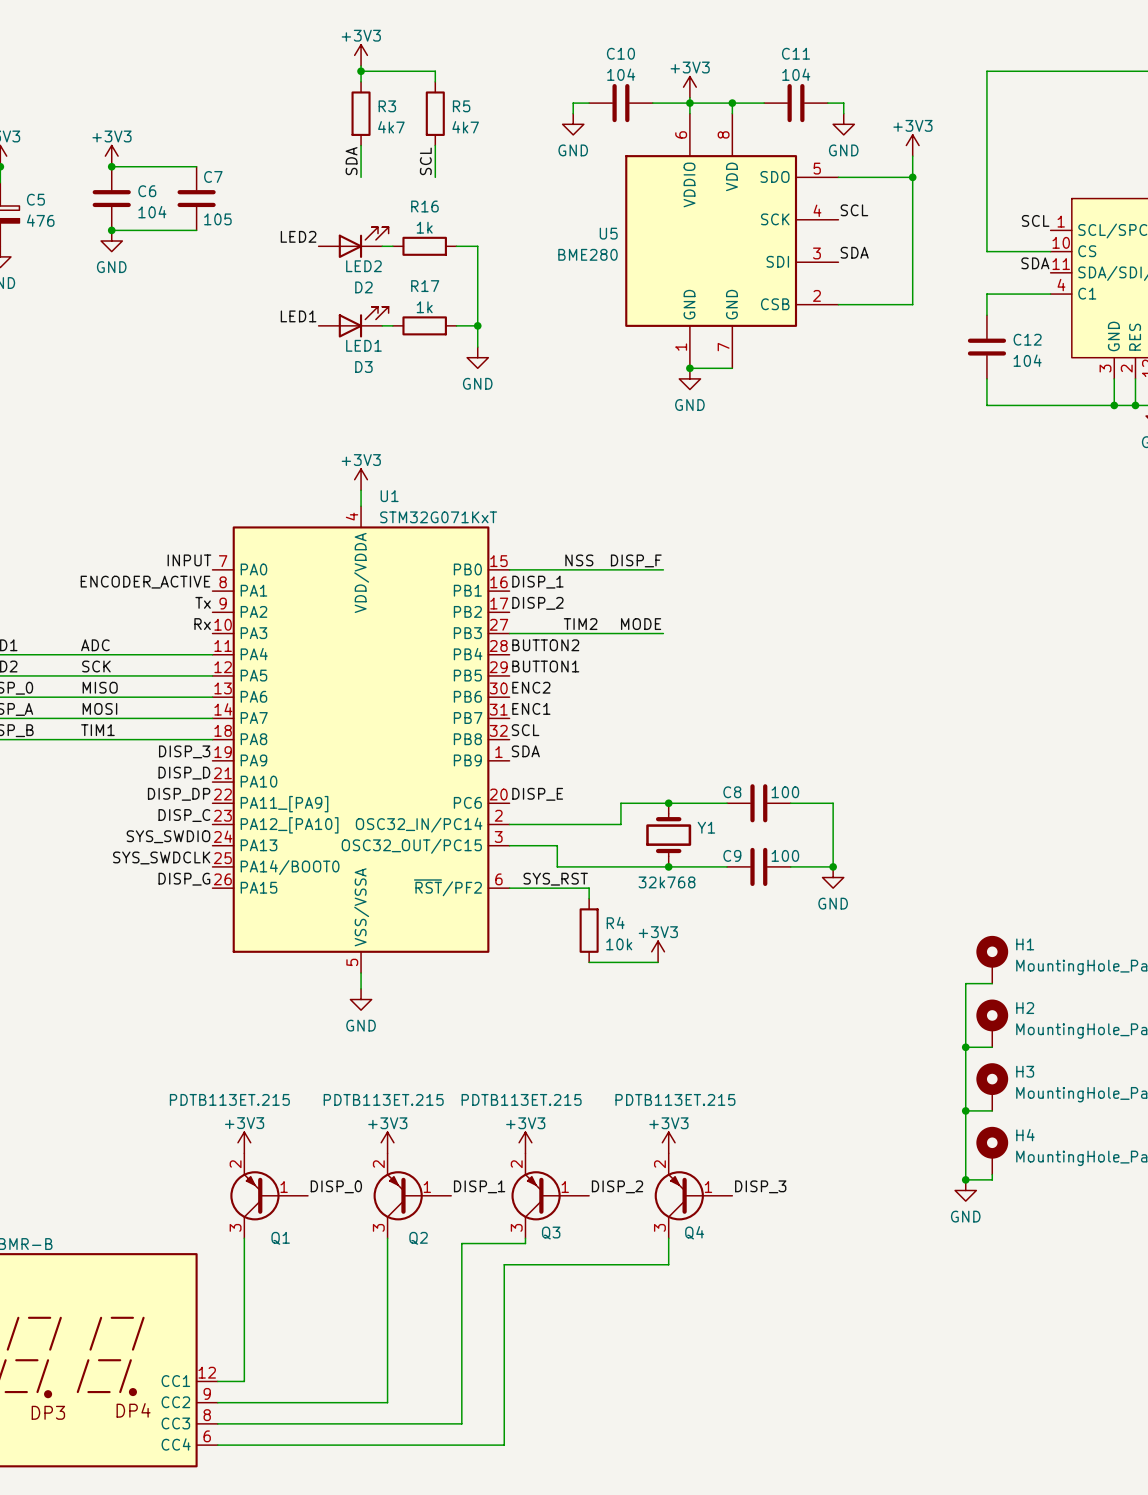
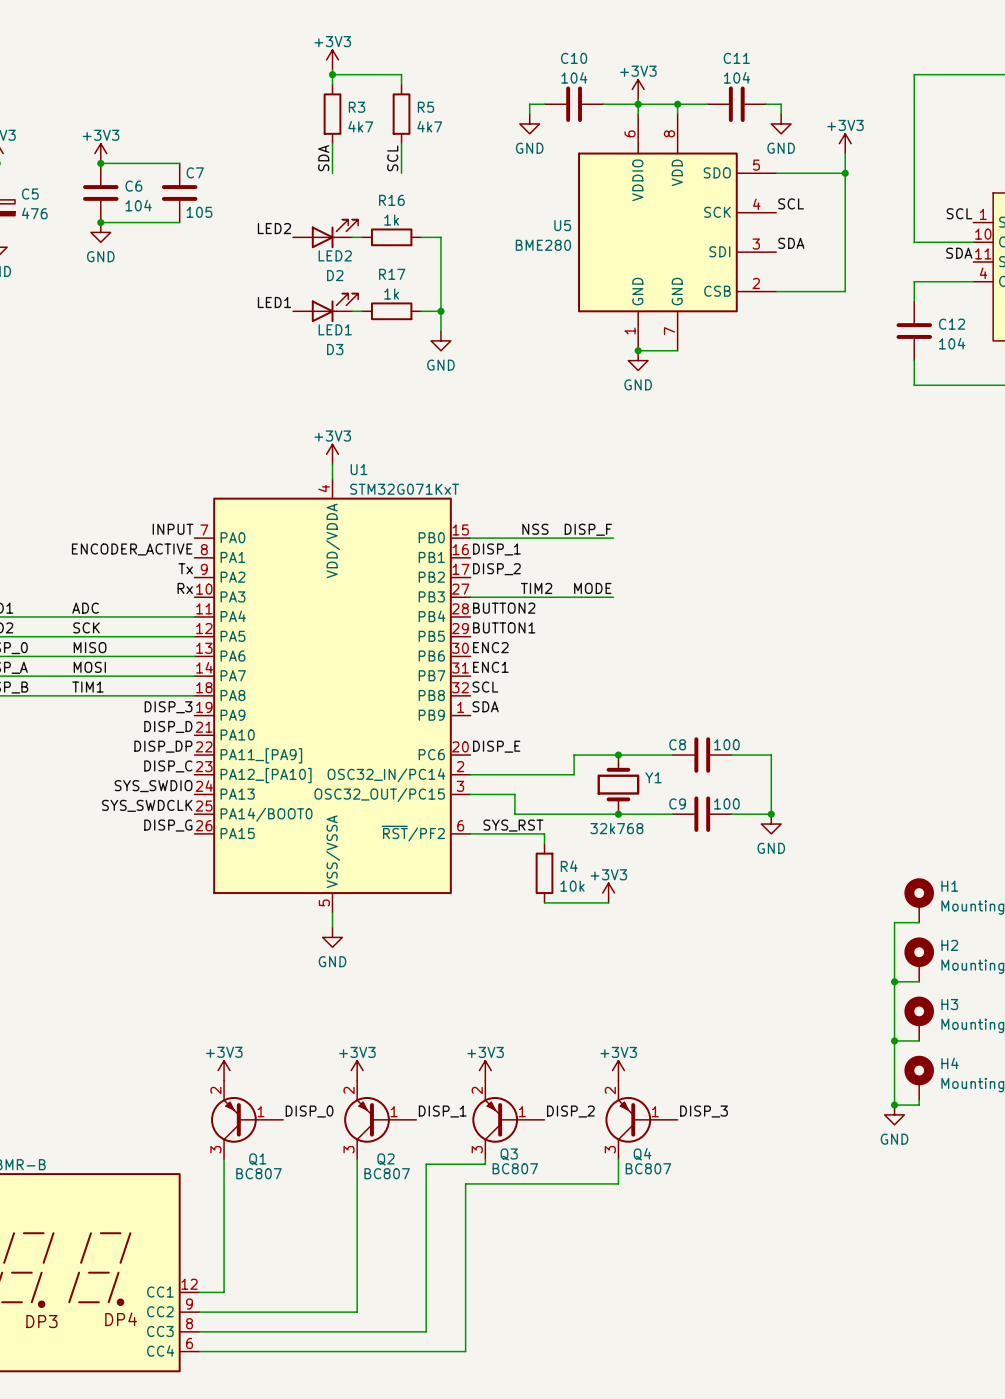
Q1 value: PDTB113ET.215 (229, 1099) -> BC807 (258, 1173)
Q2 value: PDTB113ET.215 (383, 1099) -> BC807 (387, 1173)
Q3 value: PDTB113ET.215 (521, 1099) -> BC807 (515, 1168)
Q4 value: PDTB113ET.215 (675, 1099) -> BC807 (648, 1168)

